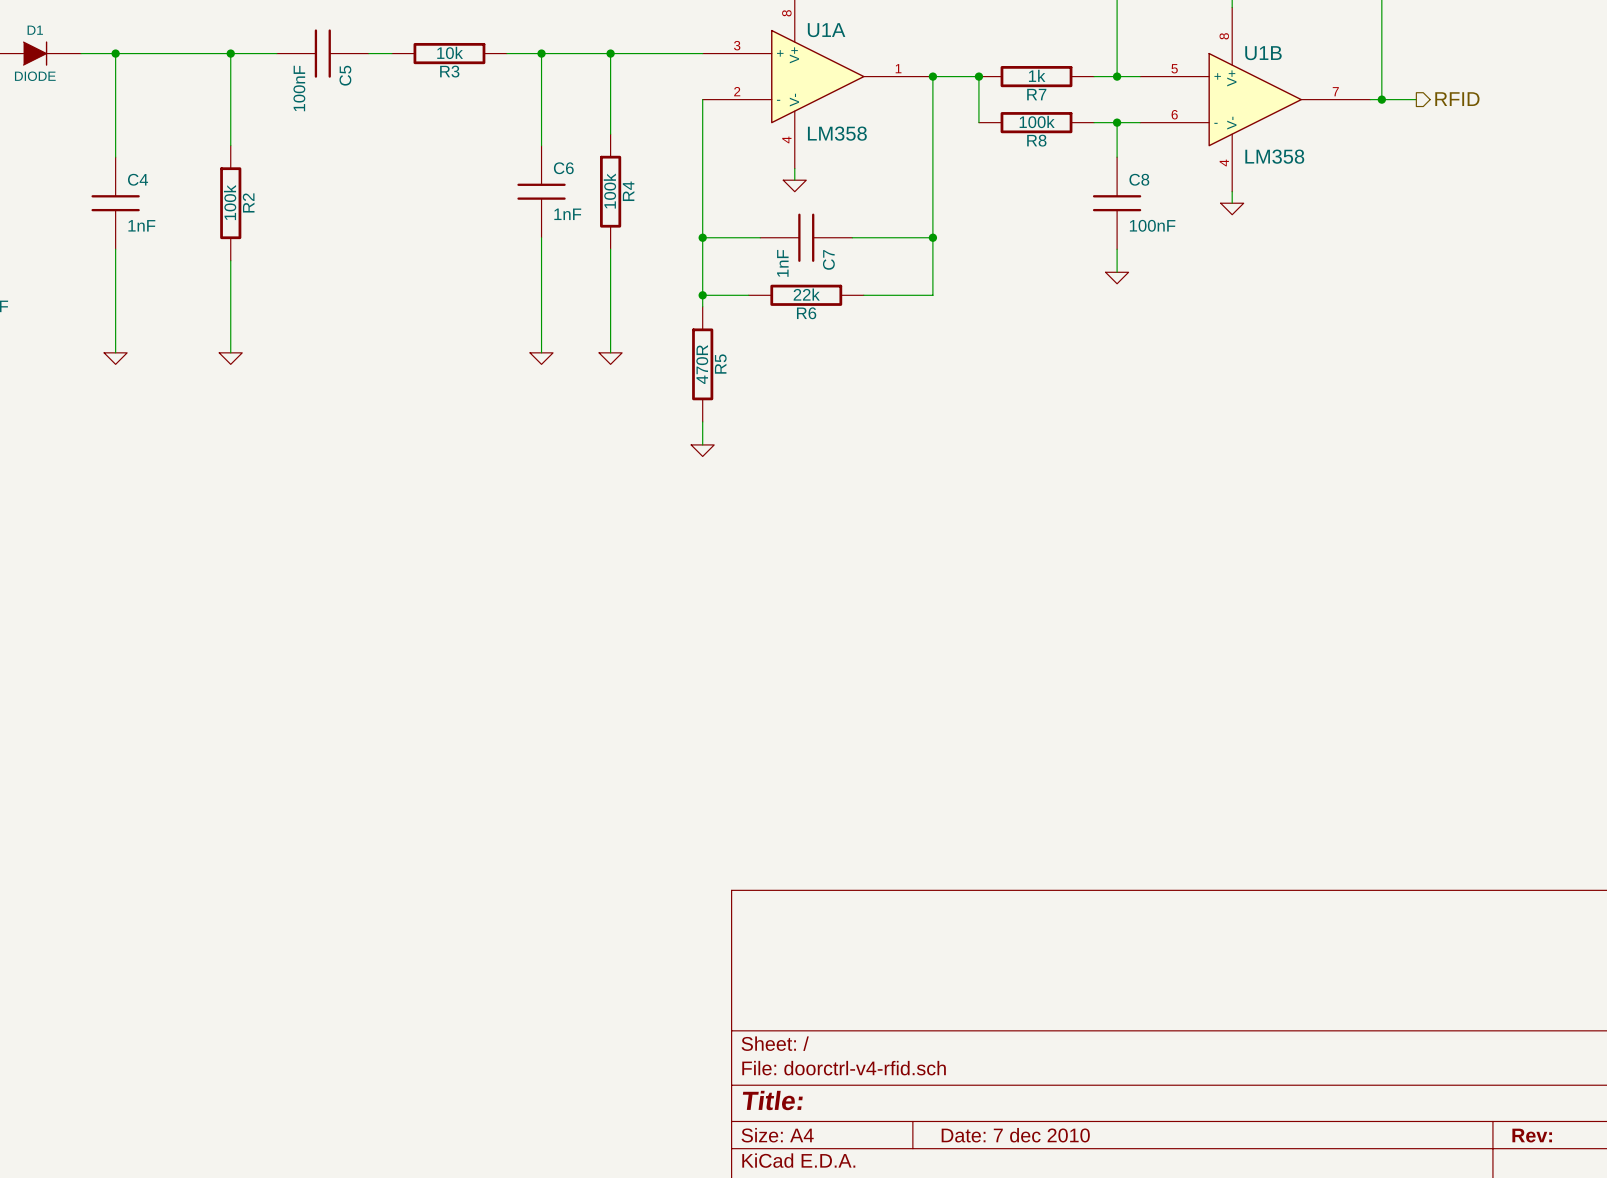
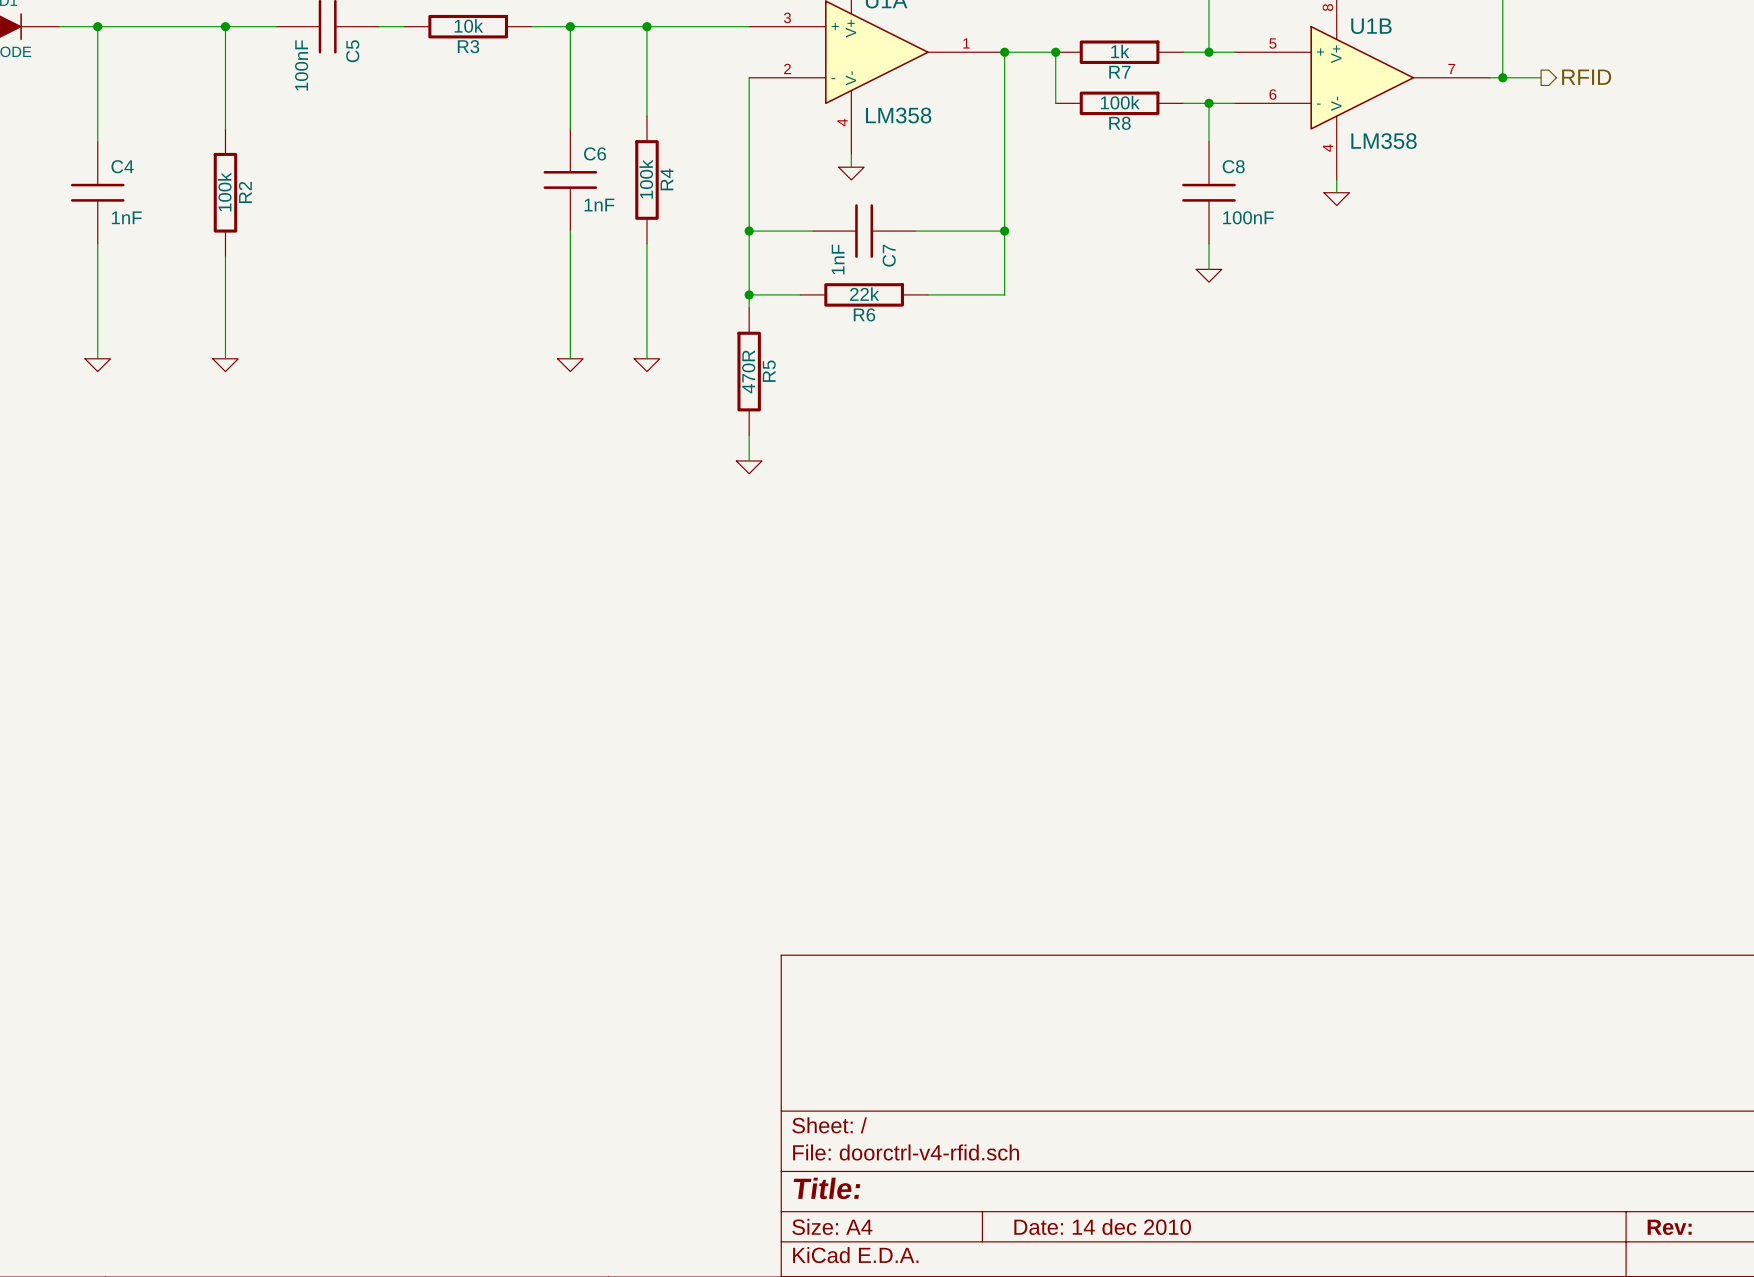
title block: Date: 7 dec 2010 (1015, 1135) -> Date: 14 dec 2010 (1102, 1226)

